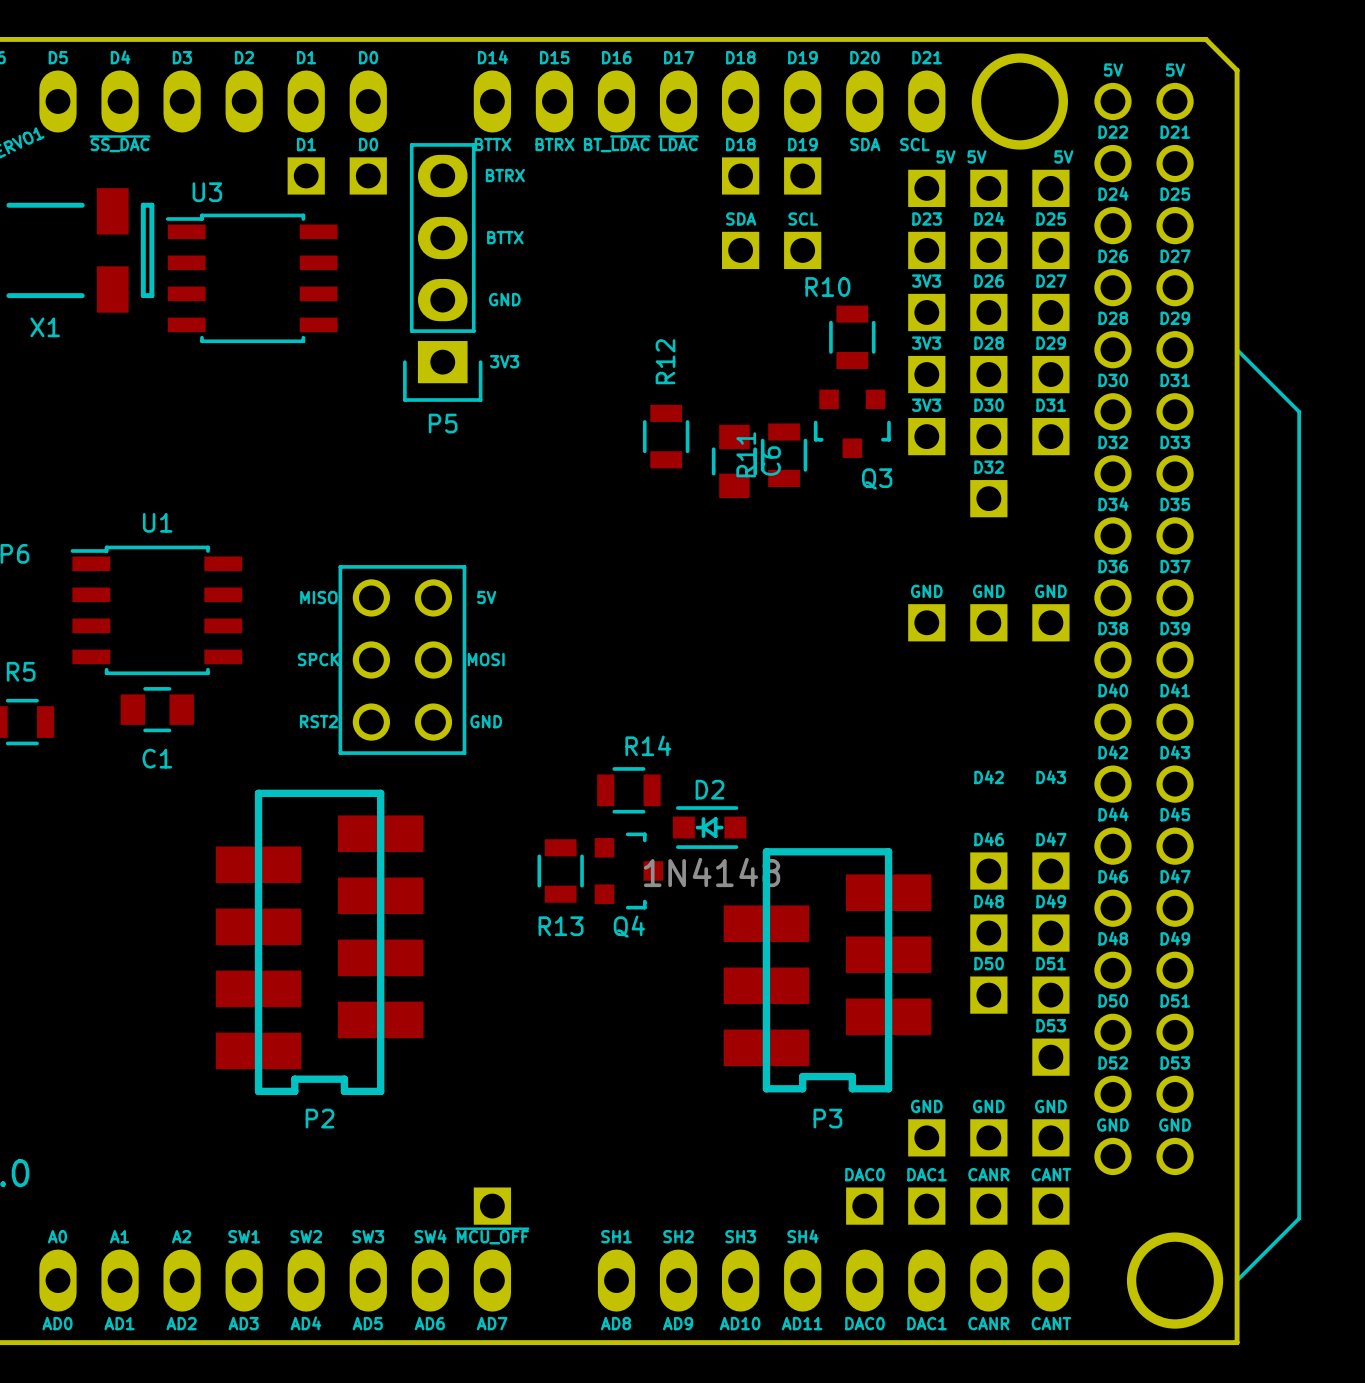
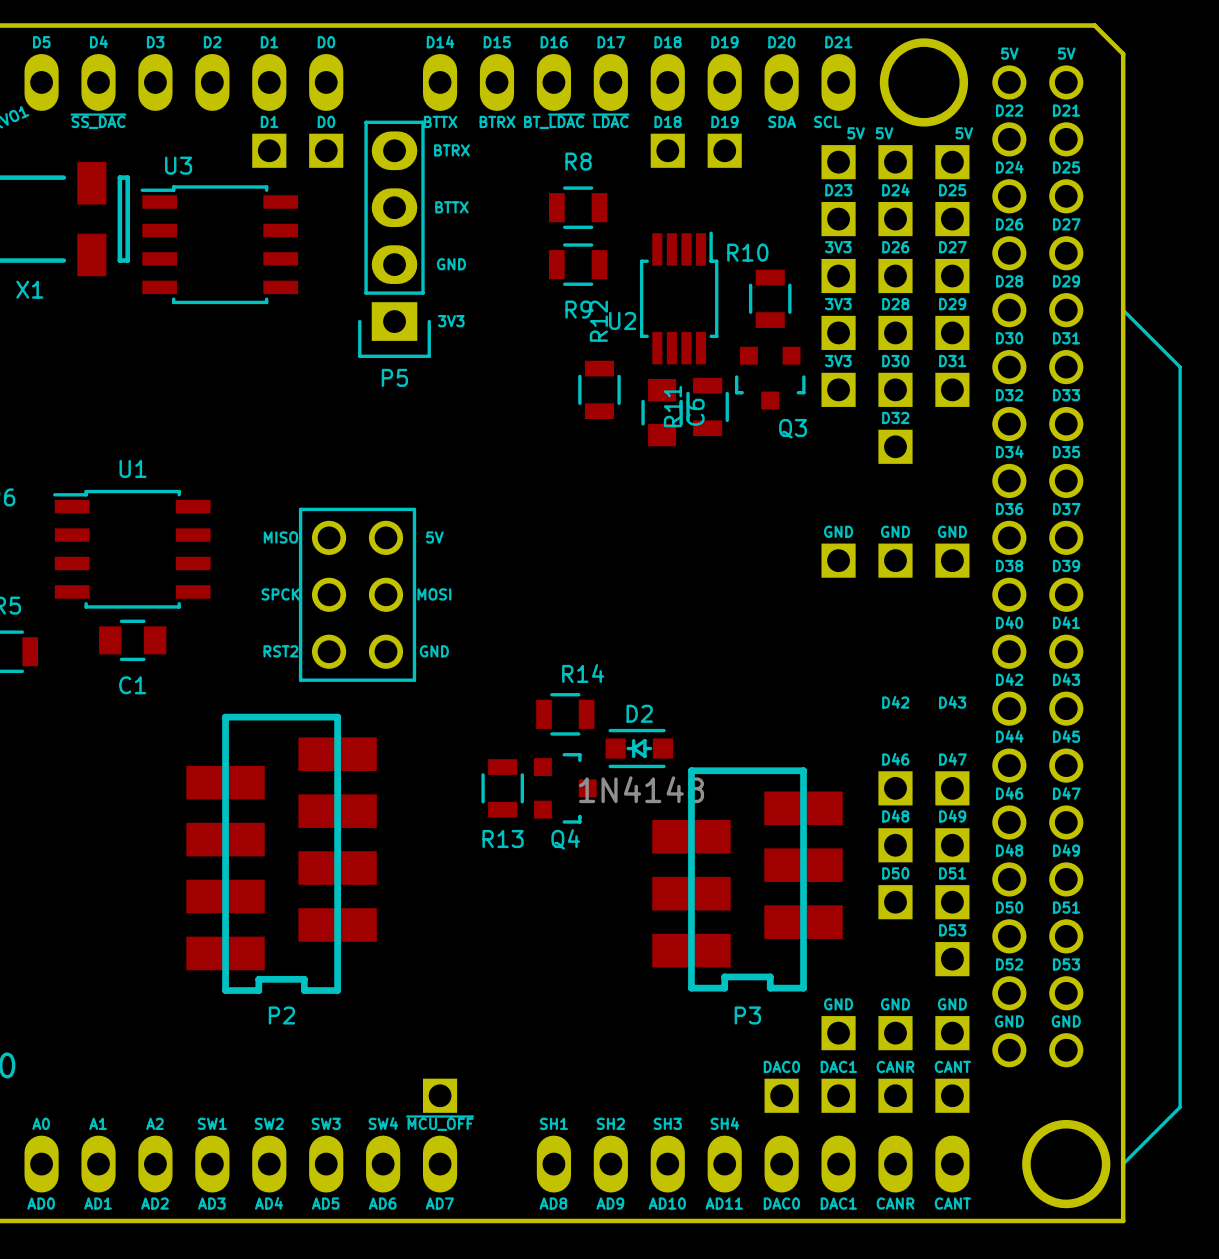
text: SDA (741, 218) -> none
text: SCL (803, 218) -> none
R8: none -> (578, 207)
part: (740, 250) -> none
part: (802, 250) -> none
R9: none -> (578, 264)
U2: none -> (679, 297)

